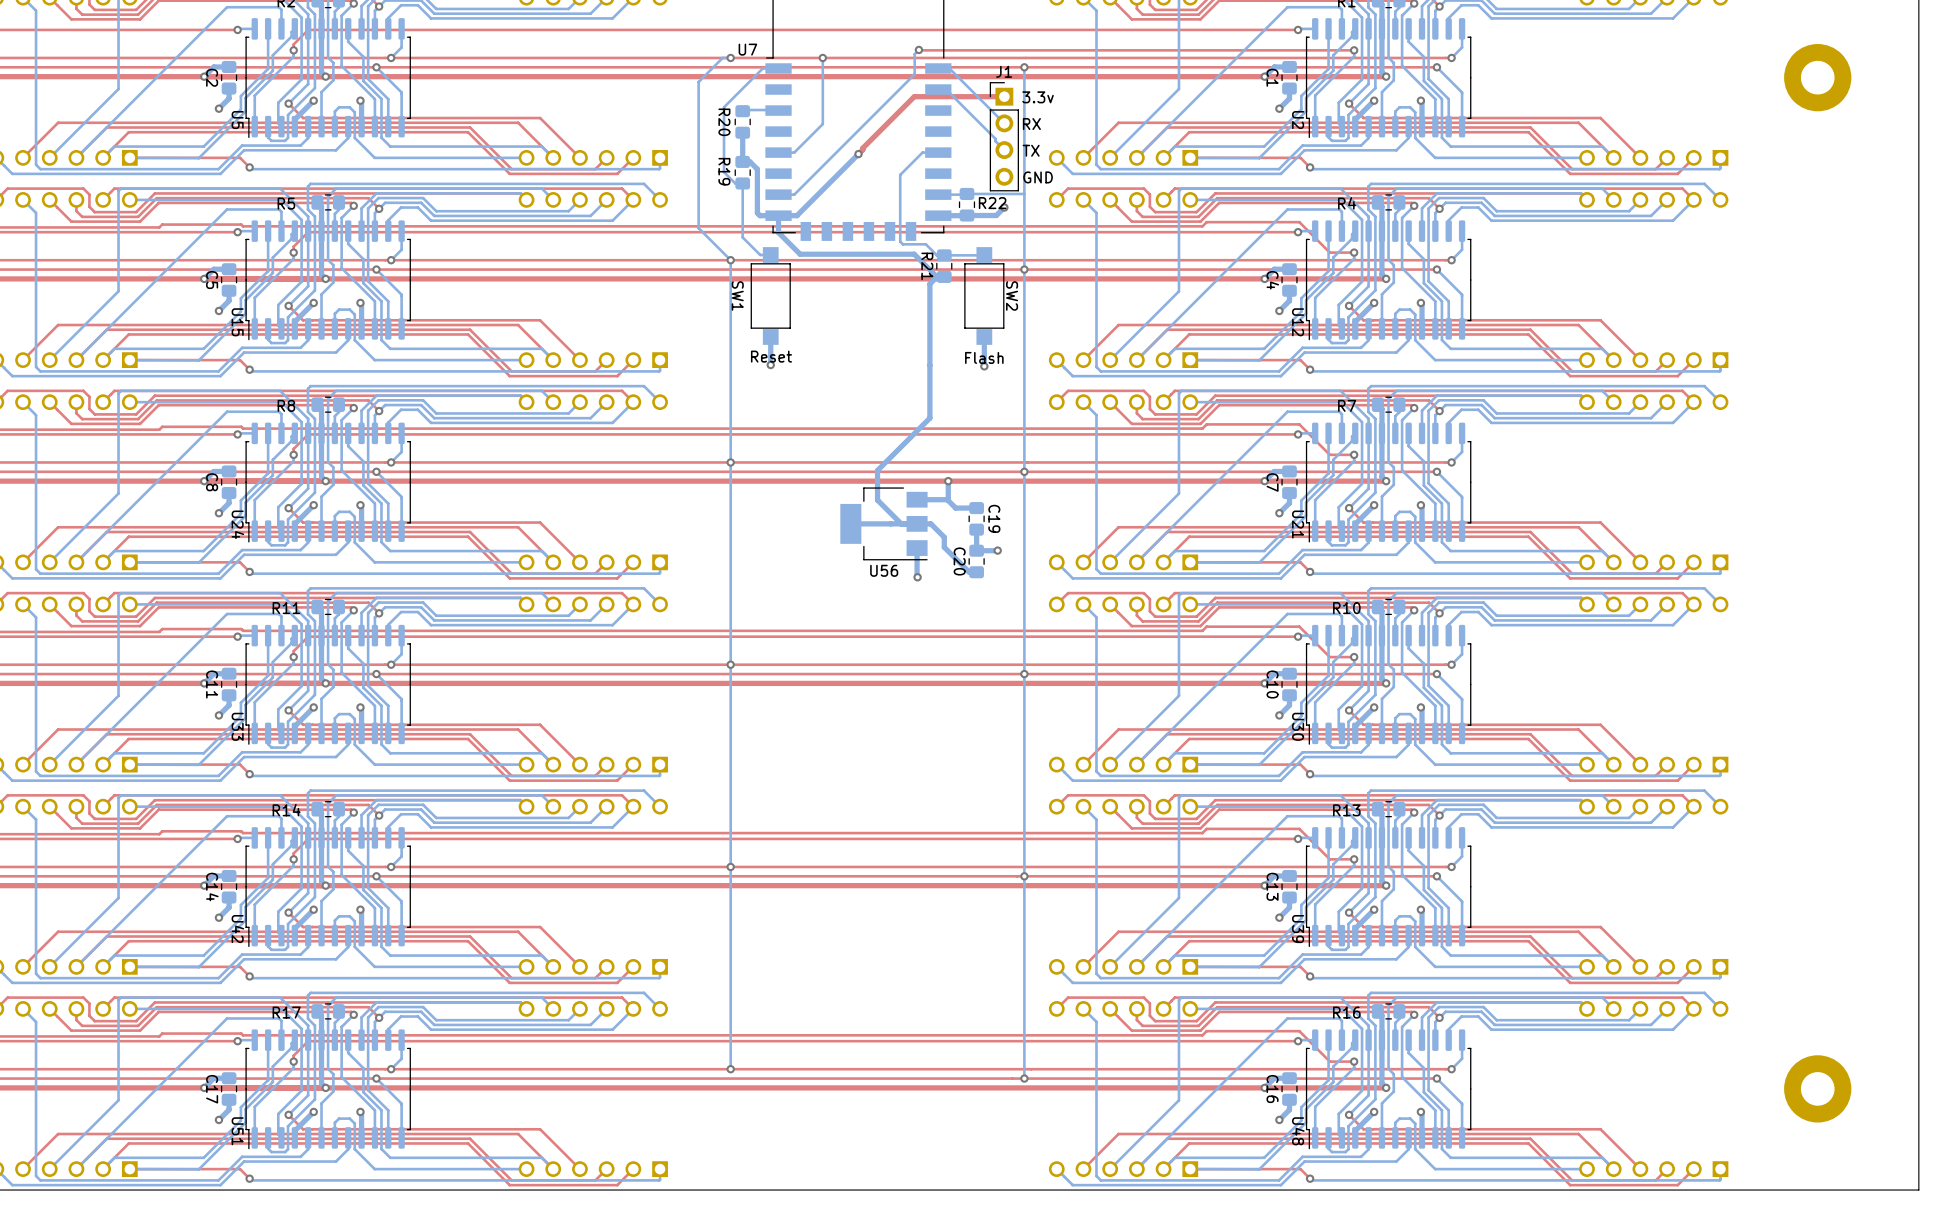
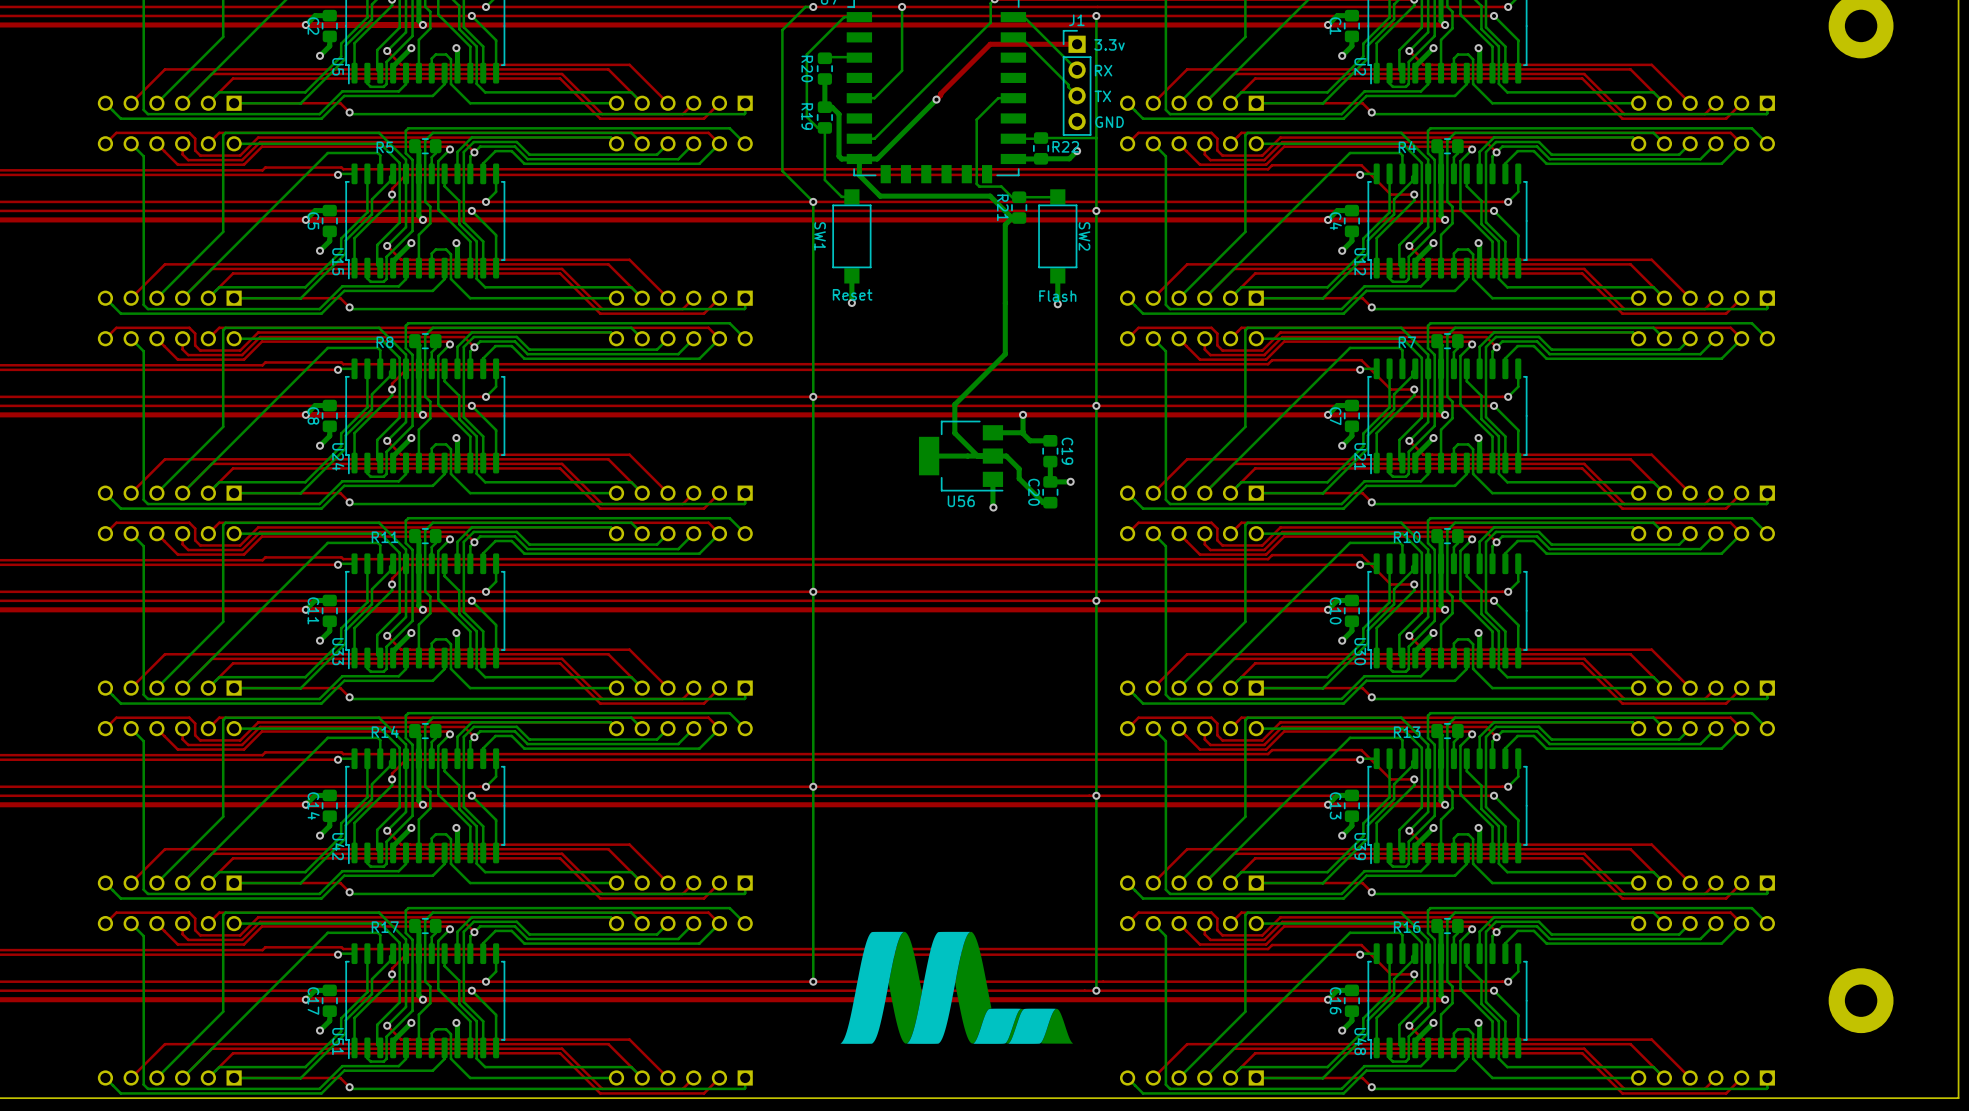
drawing: none -> [840, 931, 1074, 1044]

